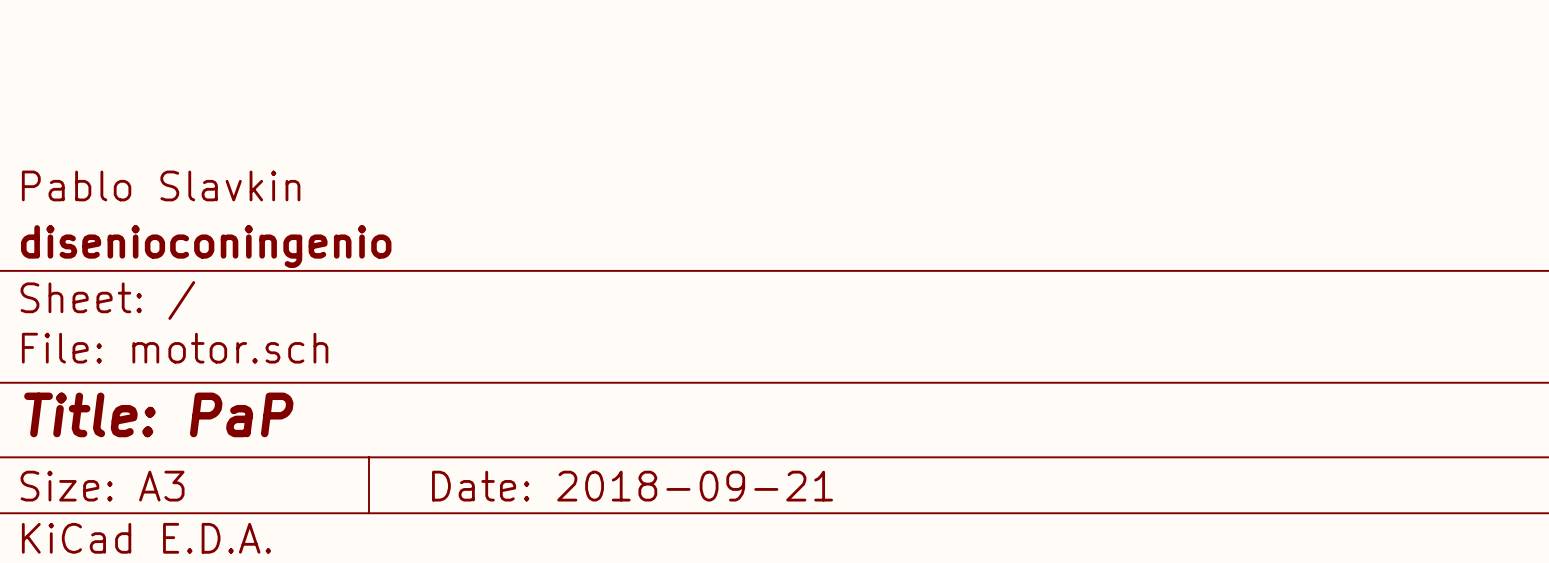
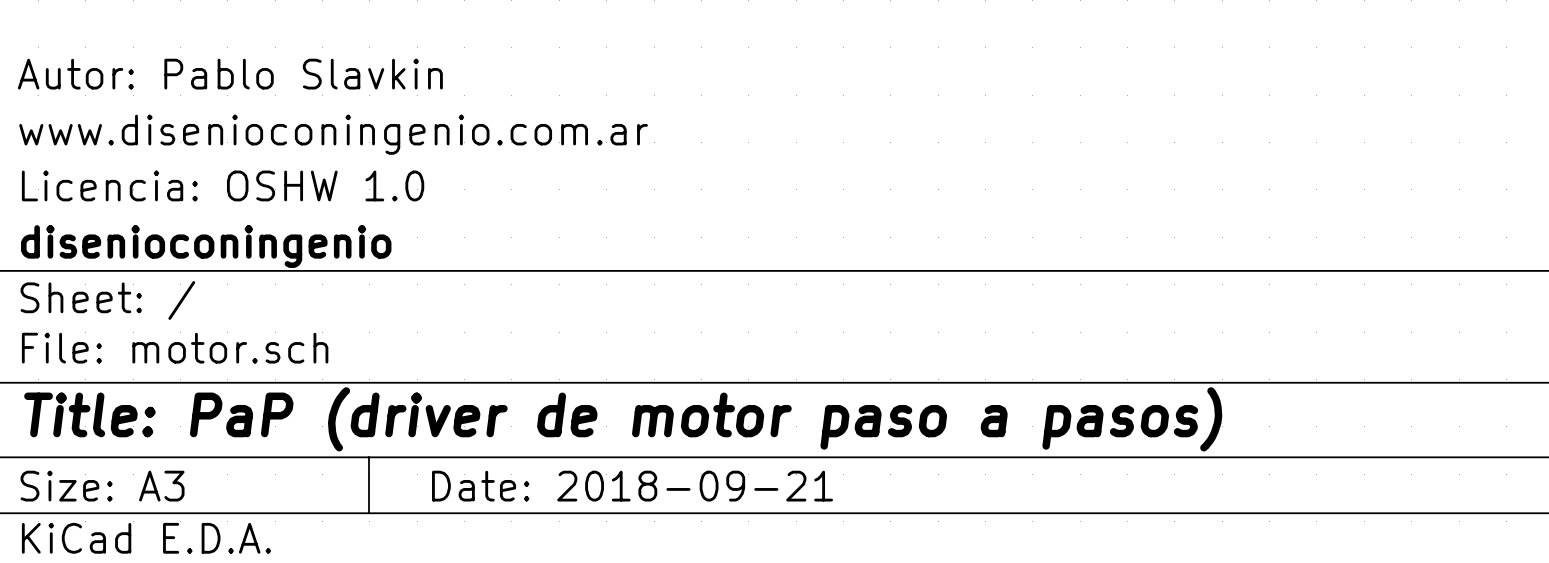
title block: none -> Autor: Pablo Slavkin (230, 74)
title block: none -> www.disenioconingenio.com.ar (333, 134)
title block: Pablo Slavkin (161, 185) -> Licencia: OSHW 1.0 (223, 185)
title block: Title: PaP (158, 414) -> Title: PaP (driver de motor paso a pasos) (623, 419)

